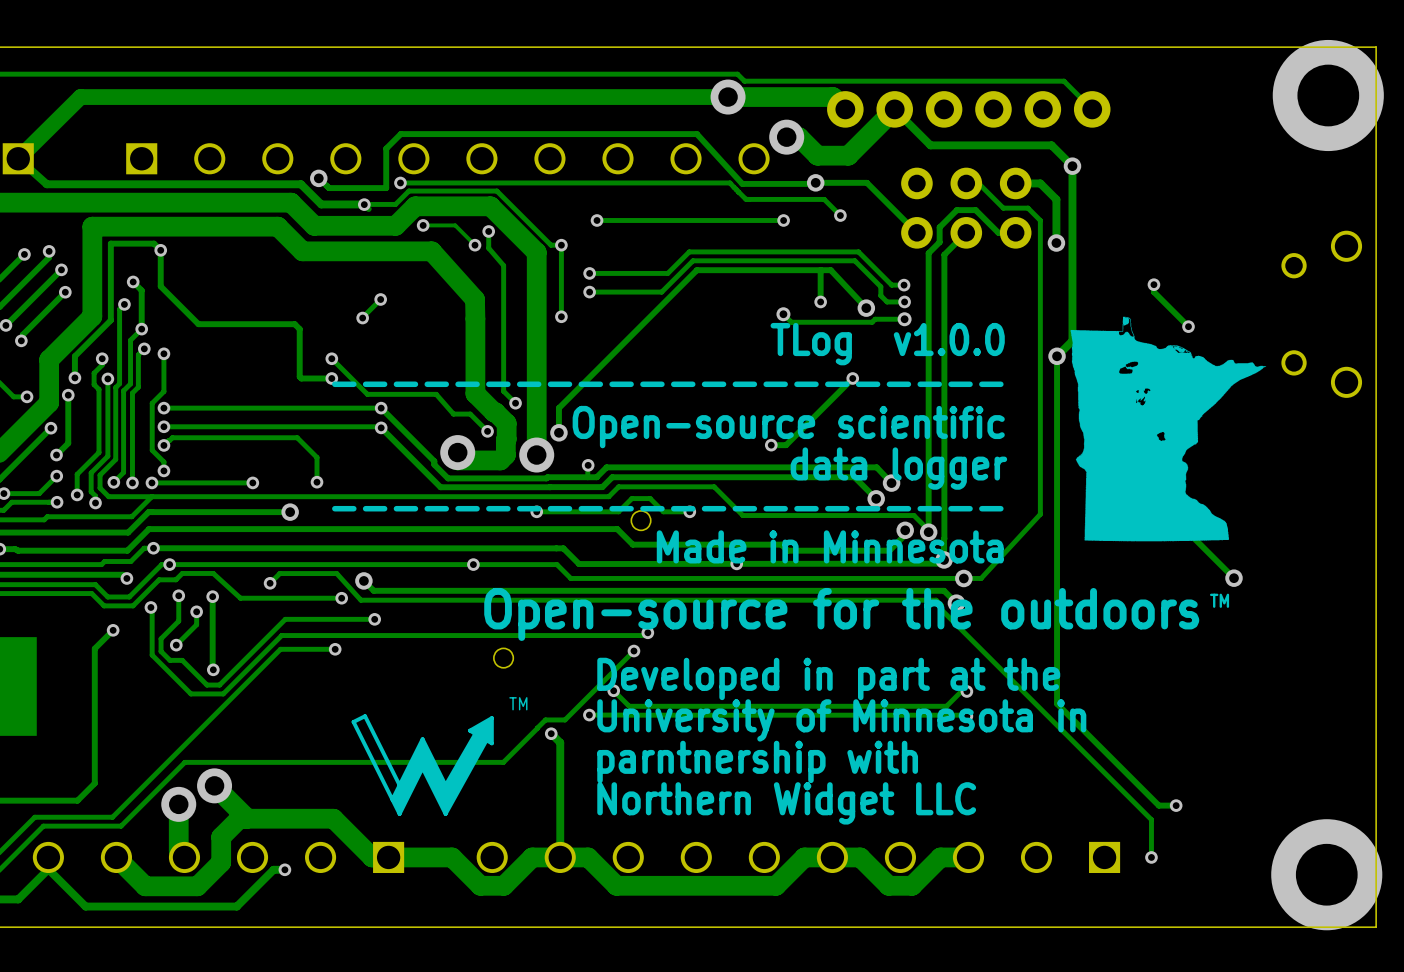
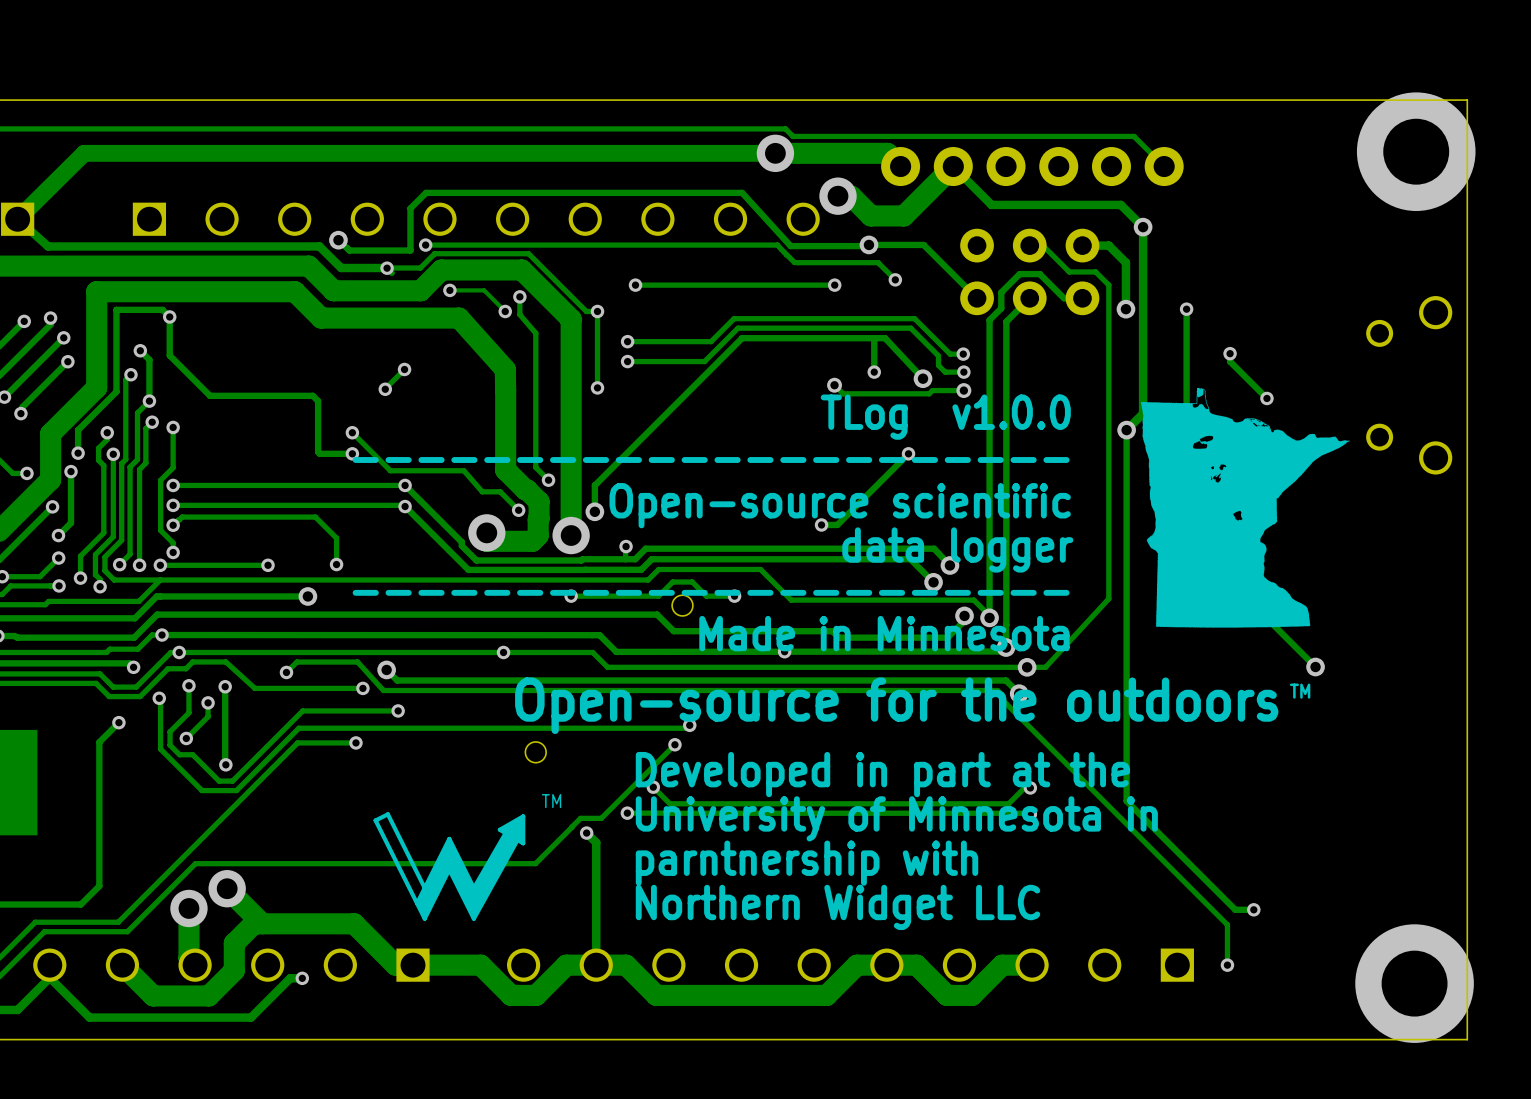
track: none -> (1186, 309) (1186, 430)
via: none -> (1186, 309)

